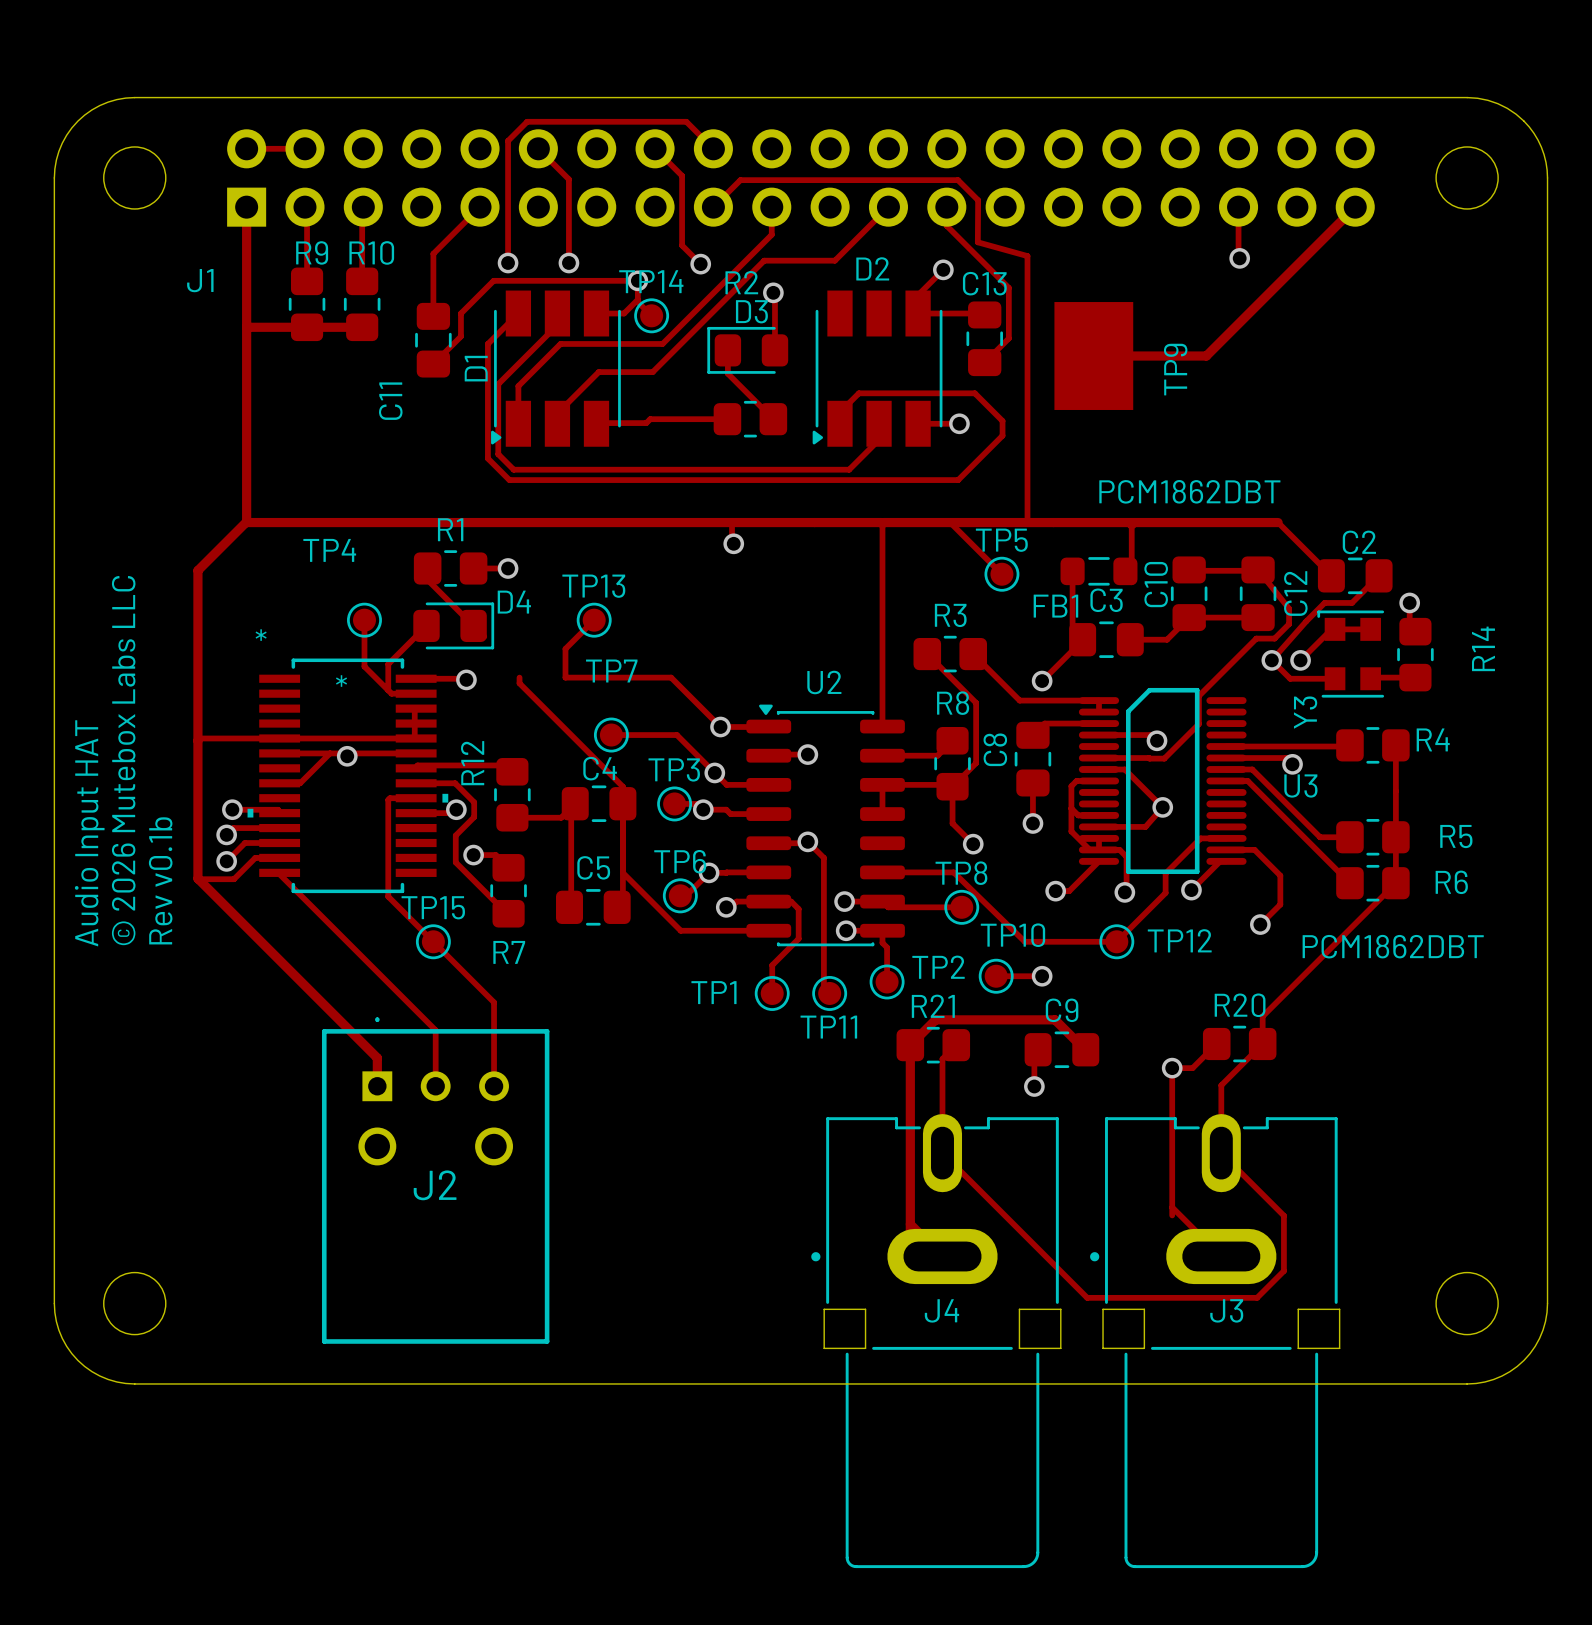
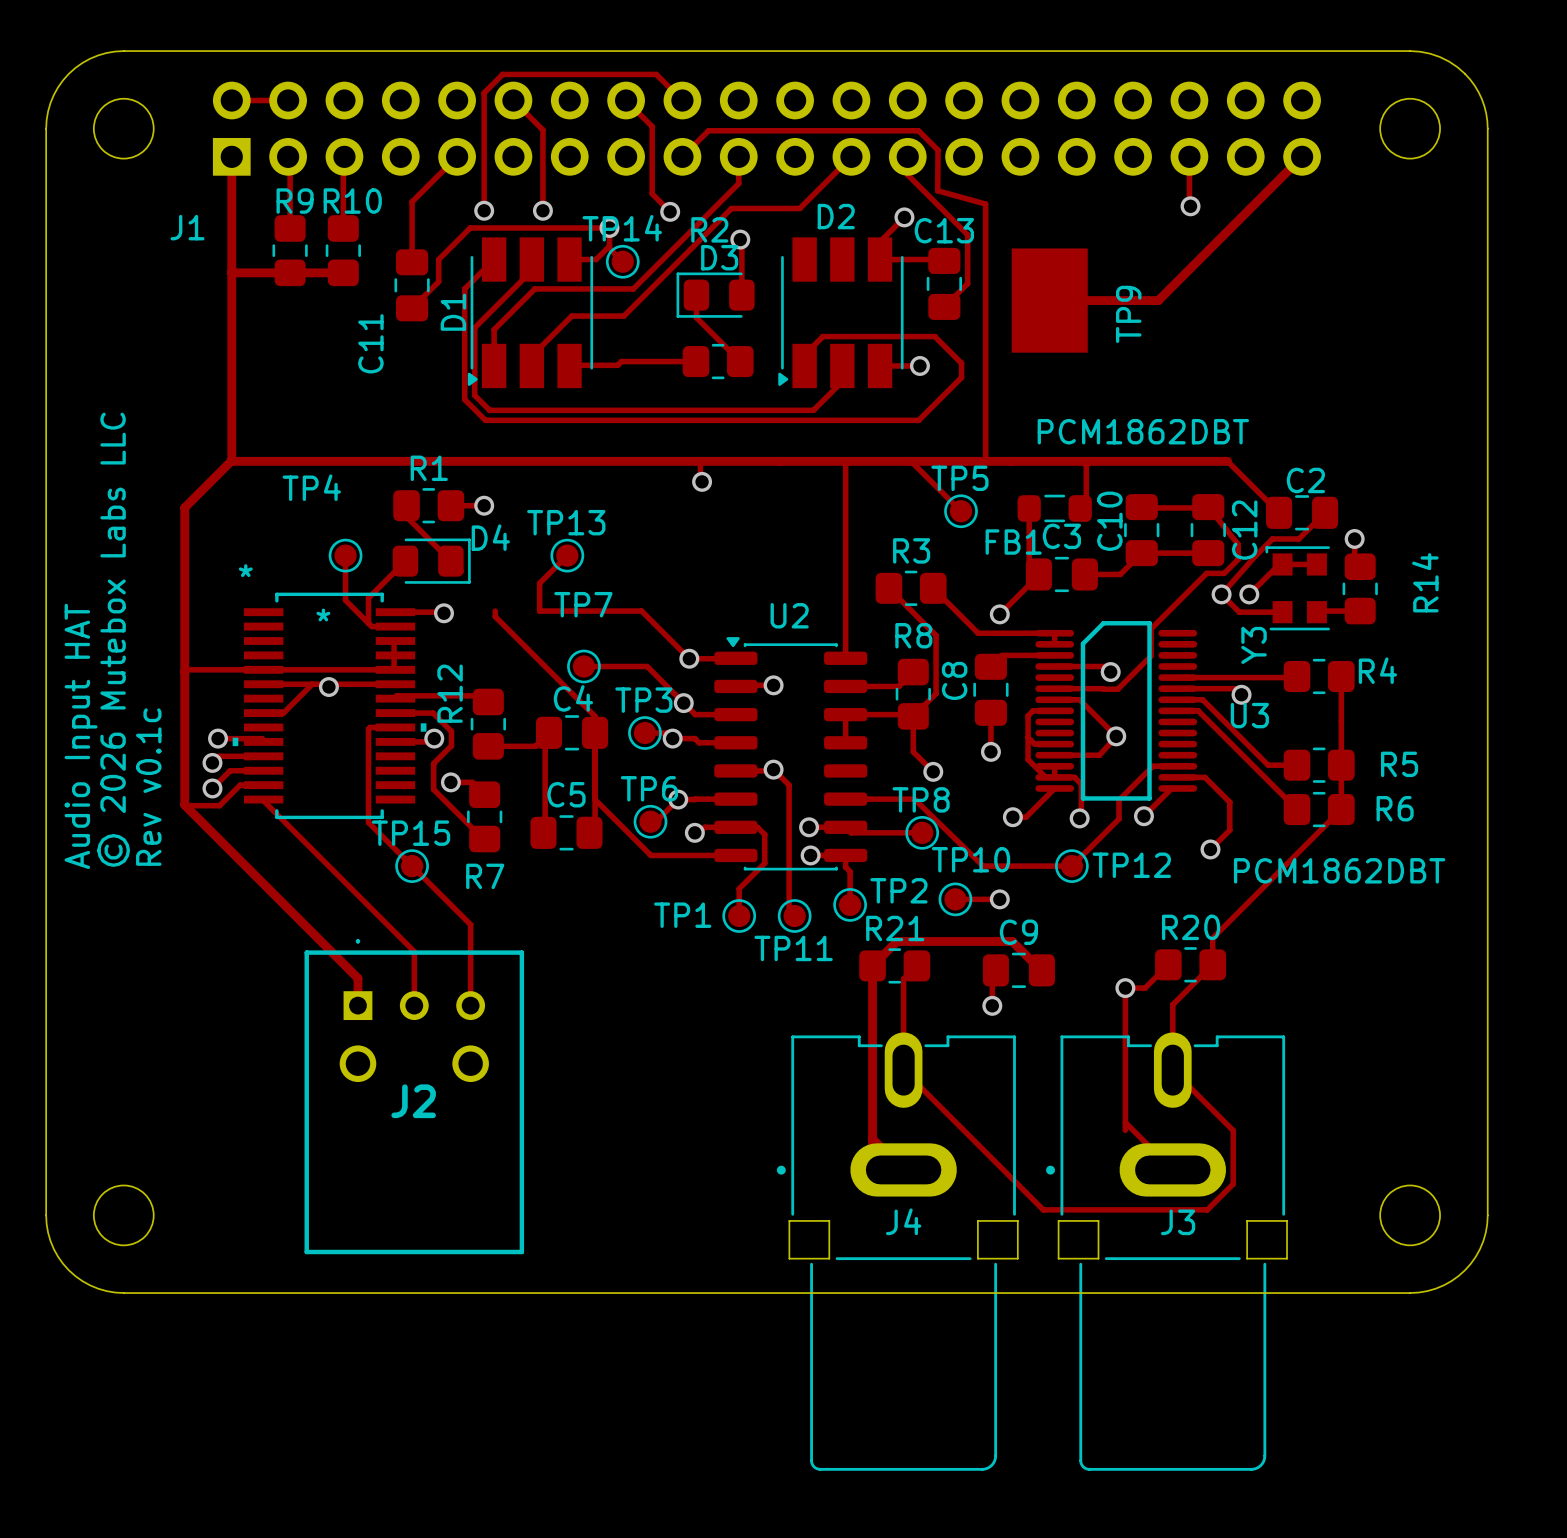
text: Rev v0.1b (160, 880) -> Rev v0.1c (148, 787)

